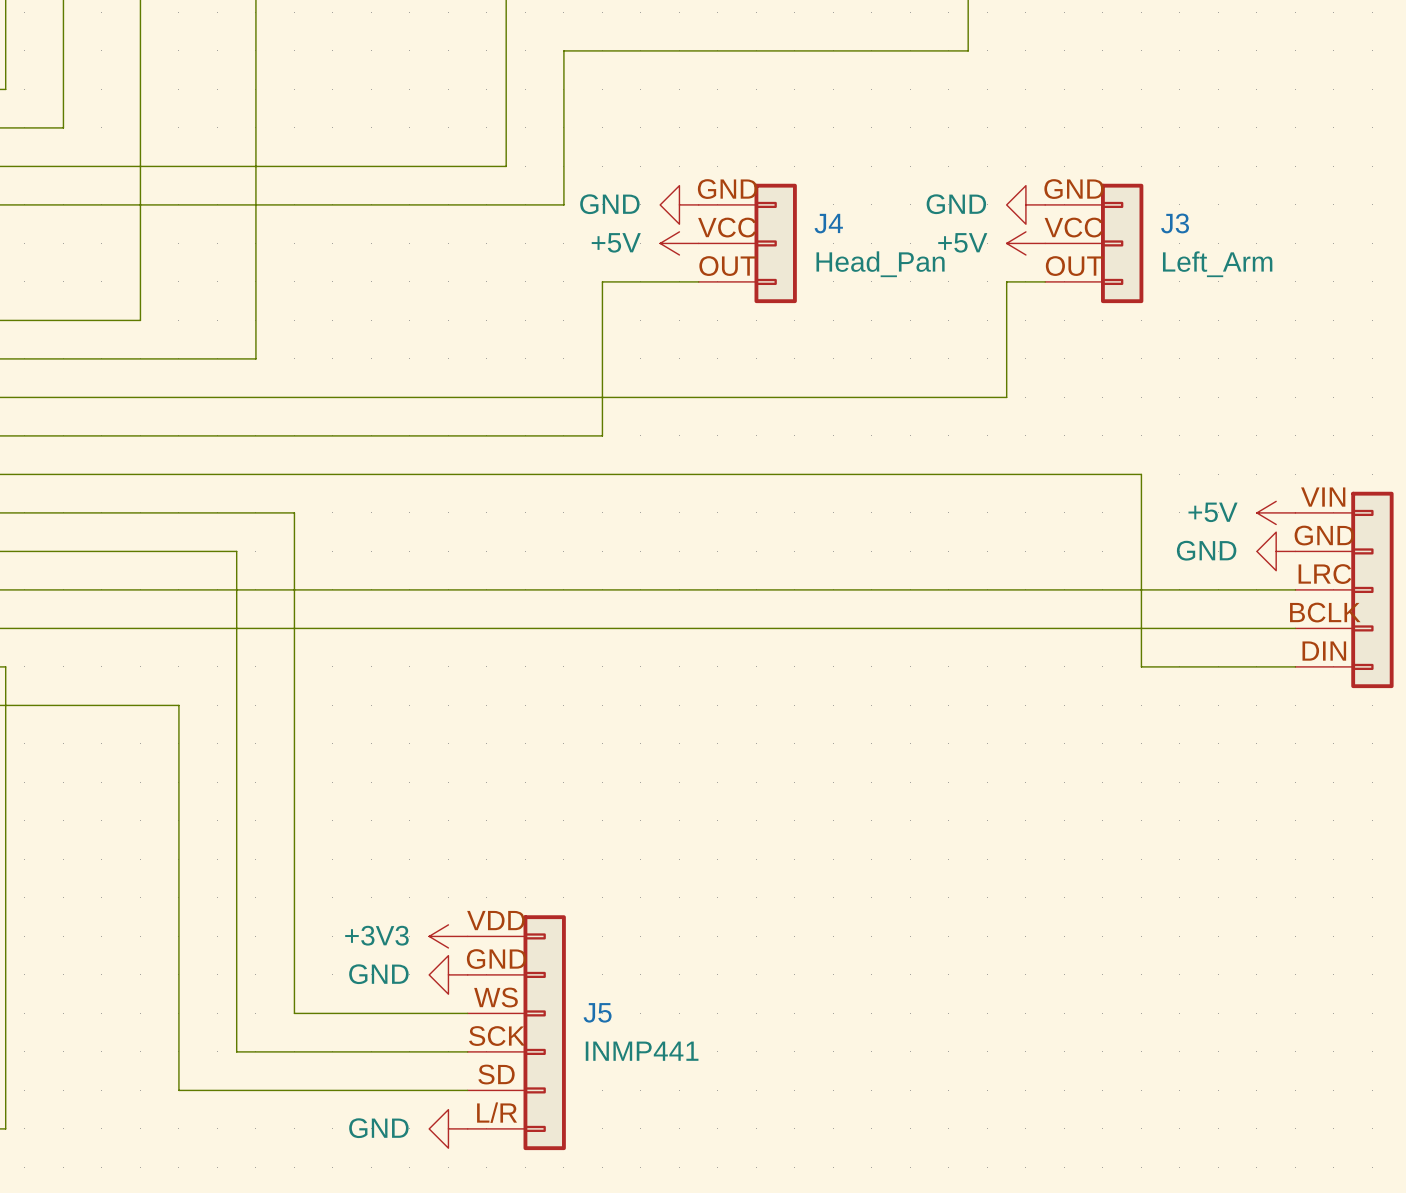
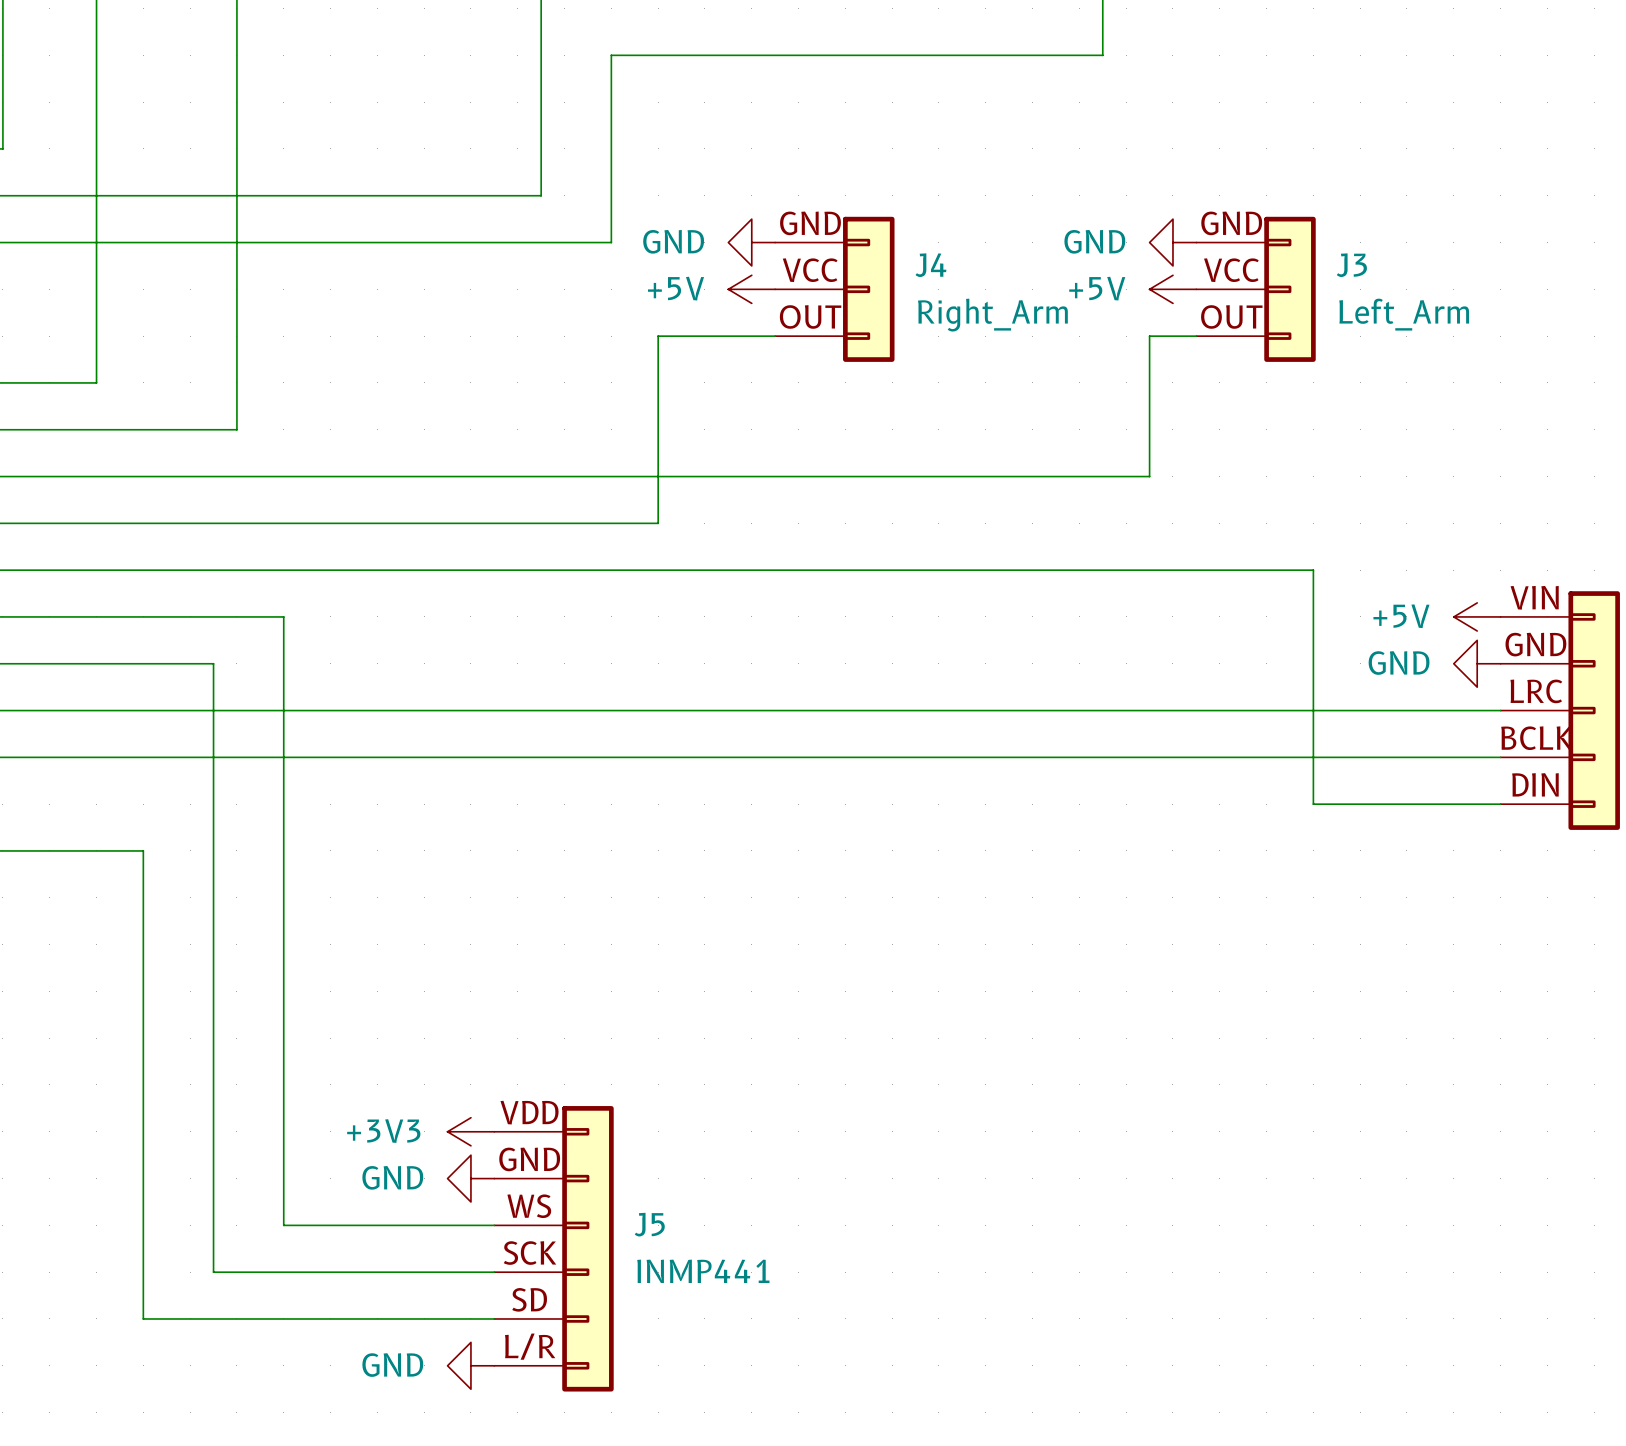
J4 value: Head_Pan (880, 264) -> Right_Arm (992, 315)

